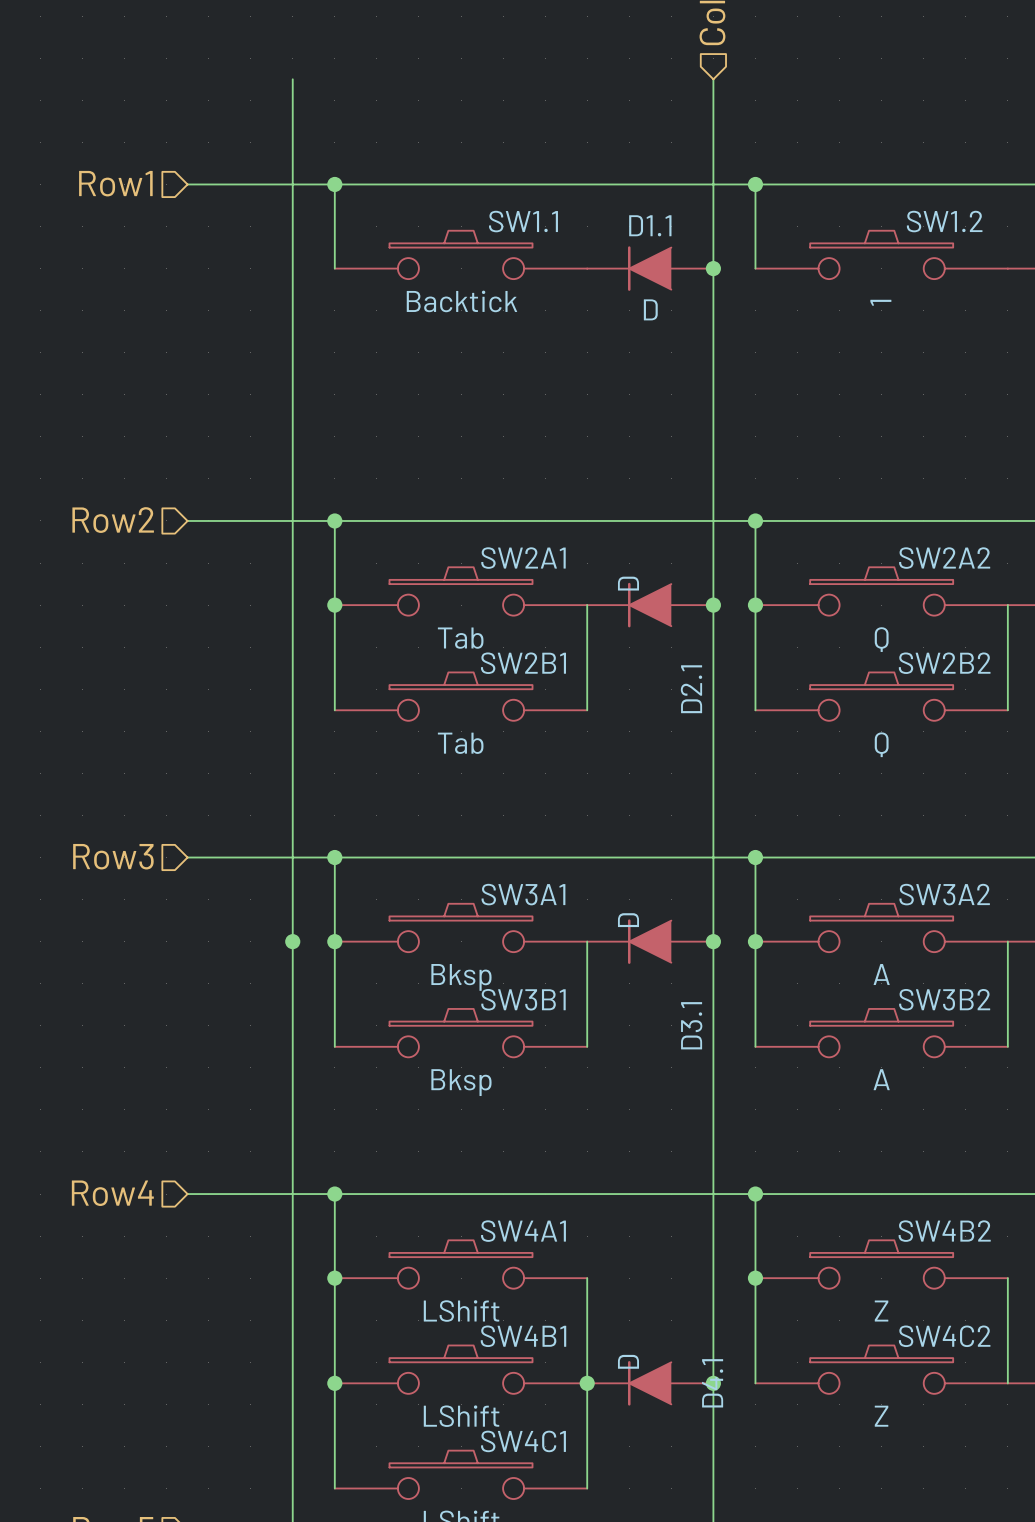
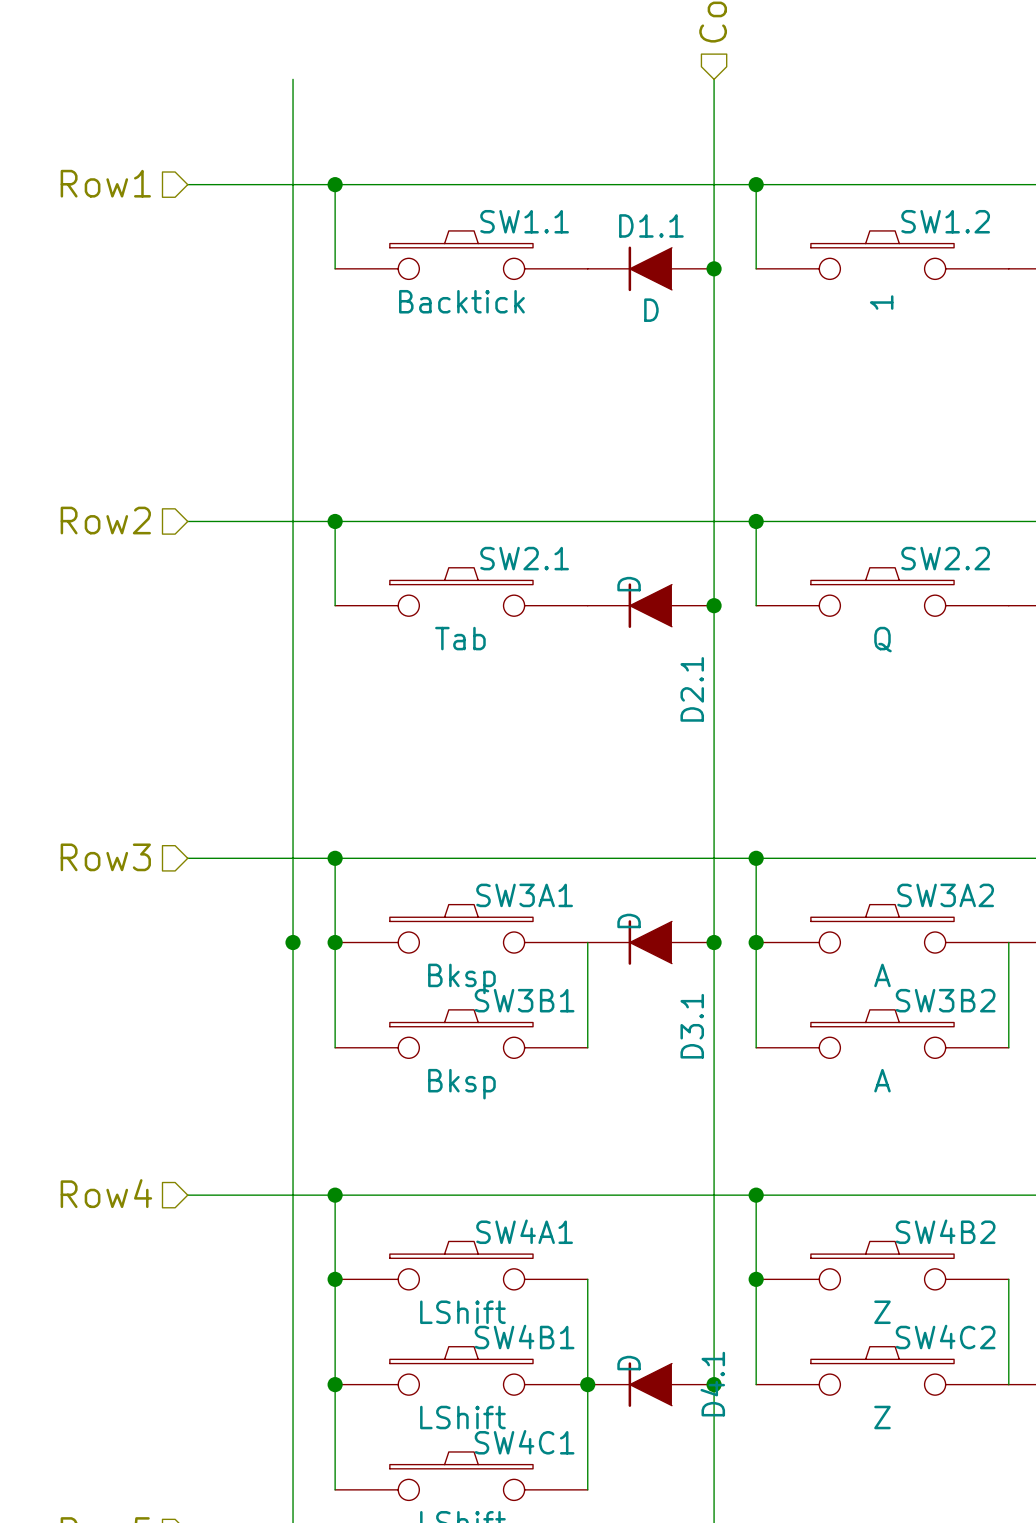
SW2A1 name: SW2A1 (523, 558) -> SW2.1 (524, 558)
SW2A2 name: SW2A2 (944, 558) -> SW2.2 (945, 558)
wire: (334, 605) (334, 710) -> none
junction: (334, 605) -> none
wire: (587, 605) (587, 710) -> none
wire: (755, 605) (755, 710) -> none
junction: (755, 605) -> none
wire: (1007, 605) (1007, 710) -> none
SW2B1: Tab (461, 696) -> none
SW2B2: Q (881, 696) -> none

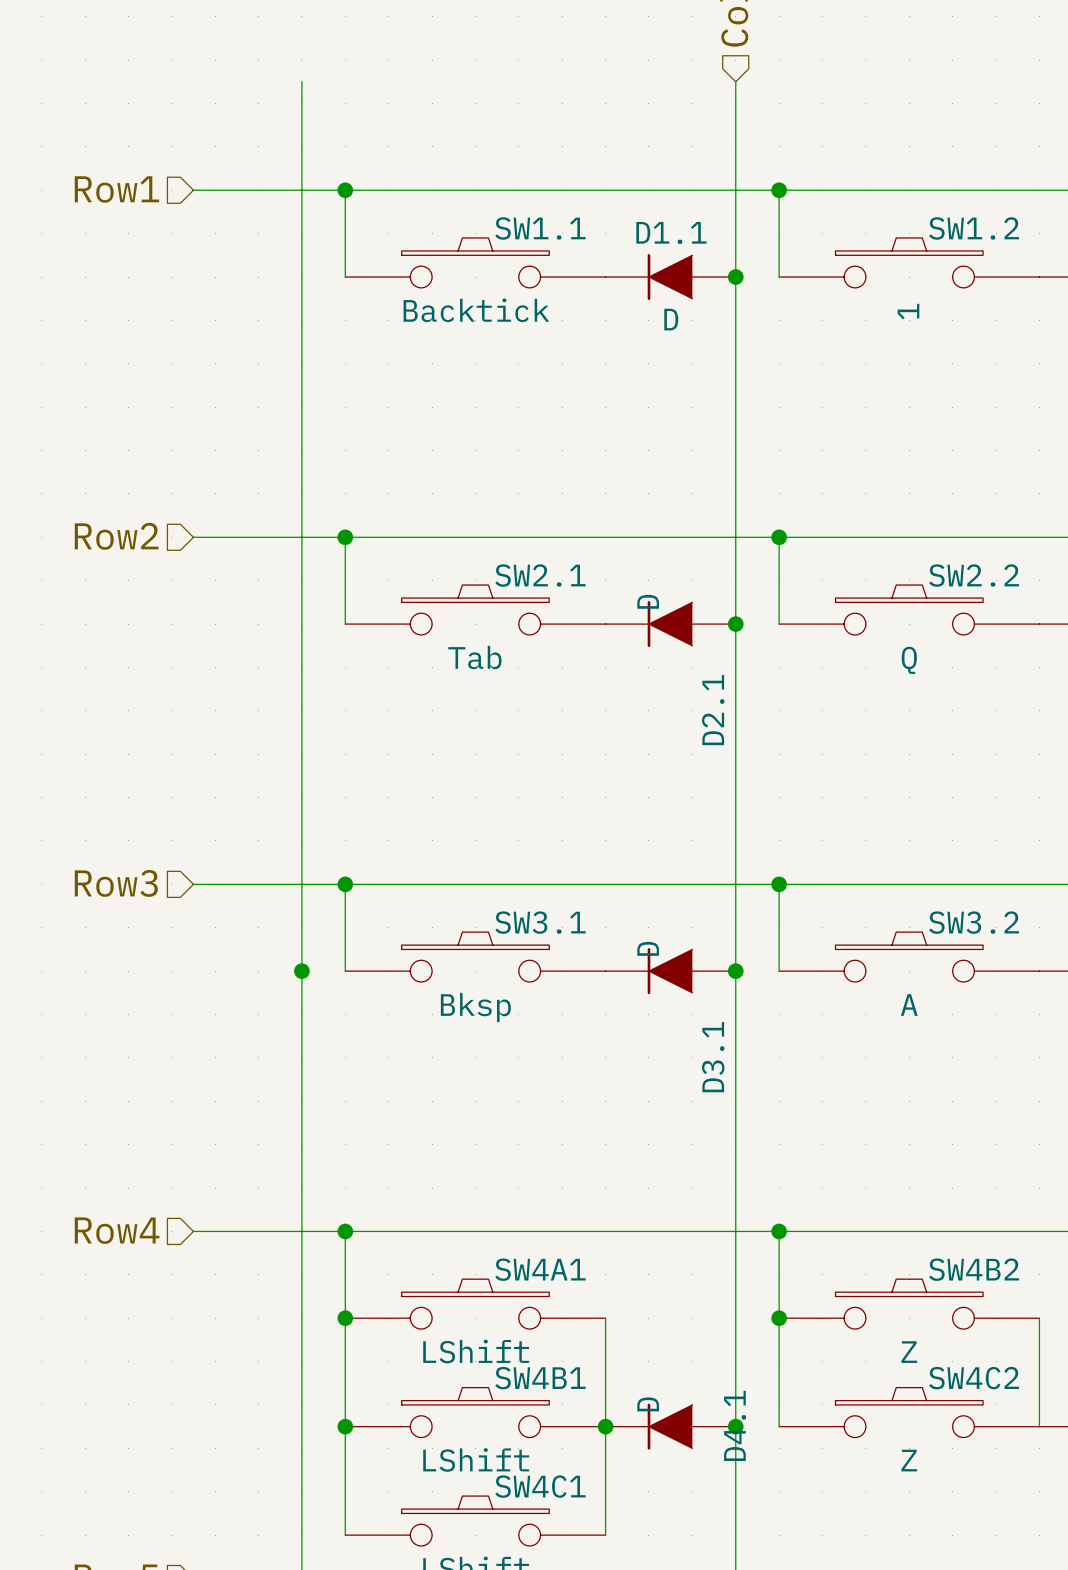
SW3A1 name: SW3A1 (524, 895) -> SW3.1 (540, 922)
SW3A2 name: SW3A2 (945, 895) -> SW3.2 (974, 922)
wire: (335, 942) (335, 1047) -> none
junction: (335, 942) -> none
wire: (587, 942) (587, 1047) -> none
wire: (756, 942) (756, 1047) -> none
junction: (756, 942) -> none
wire: (1008, 942) (1008, 1047) -> none
SW3B1: Bksp (461, 1034) -> none
SW3B2: A (882, 1034) -> none

